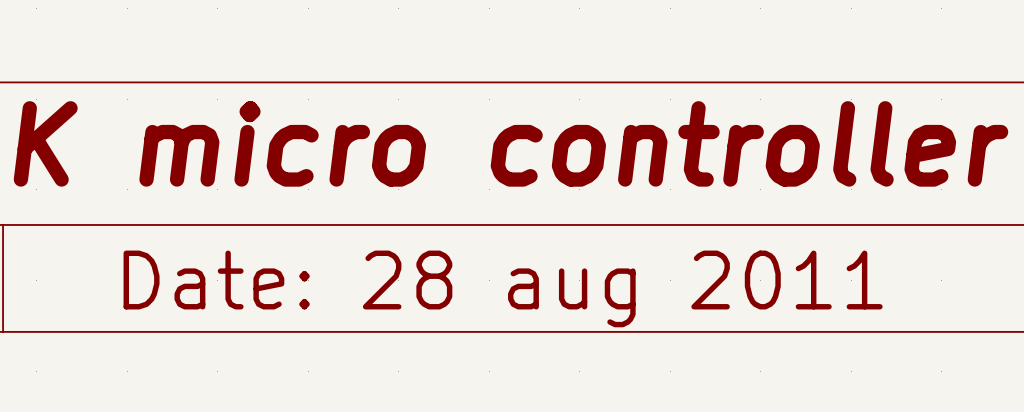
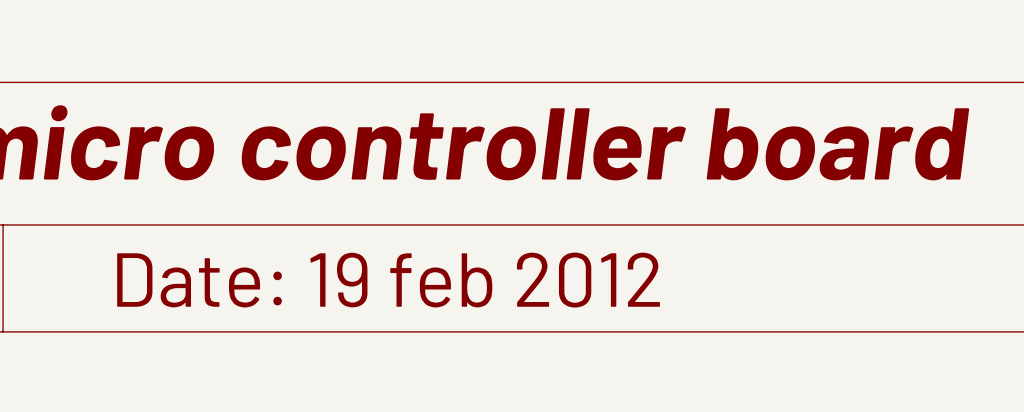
title block: Date: 28 aug 2011 (503, 288) -> Date: 19 feb 2012 (388, 280)

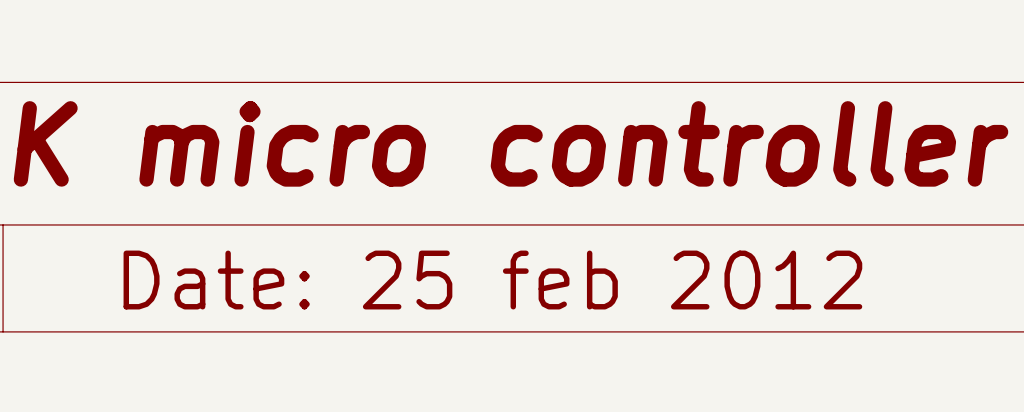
title block: Date: 19 feb 2012 (388, 280) -> Date: 25 feb 2012 (492, 280)

